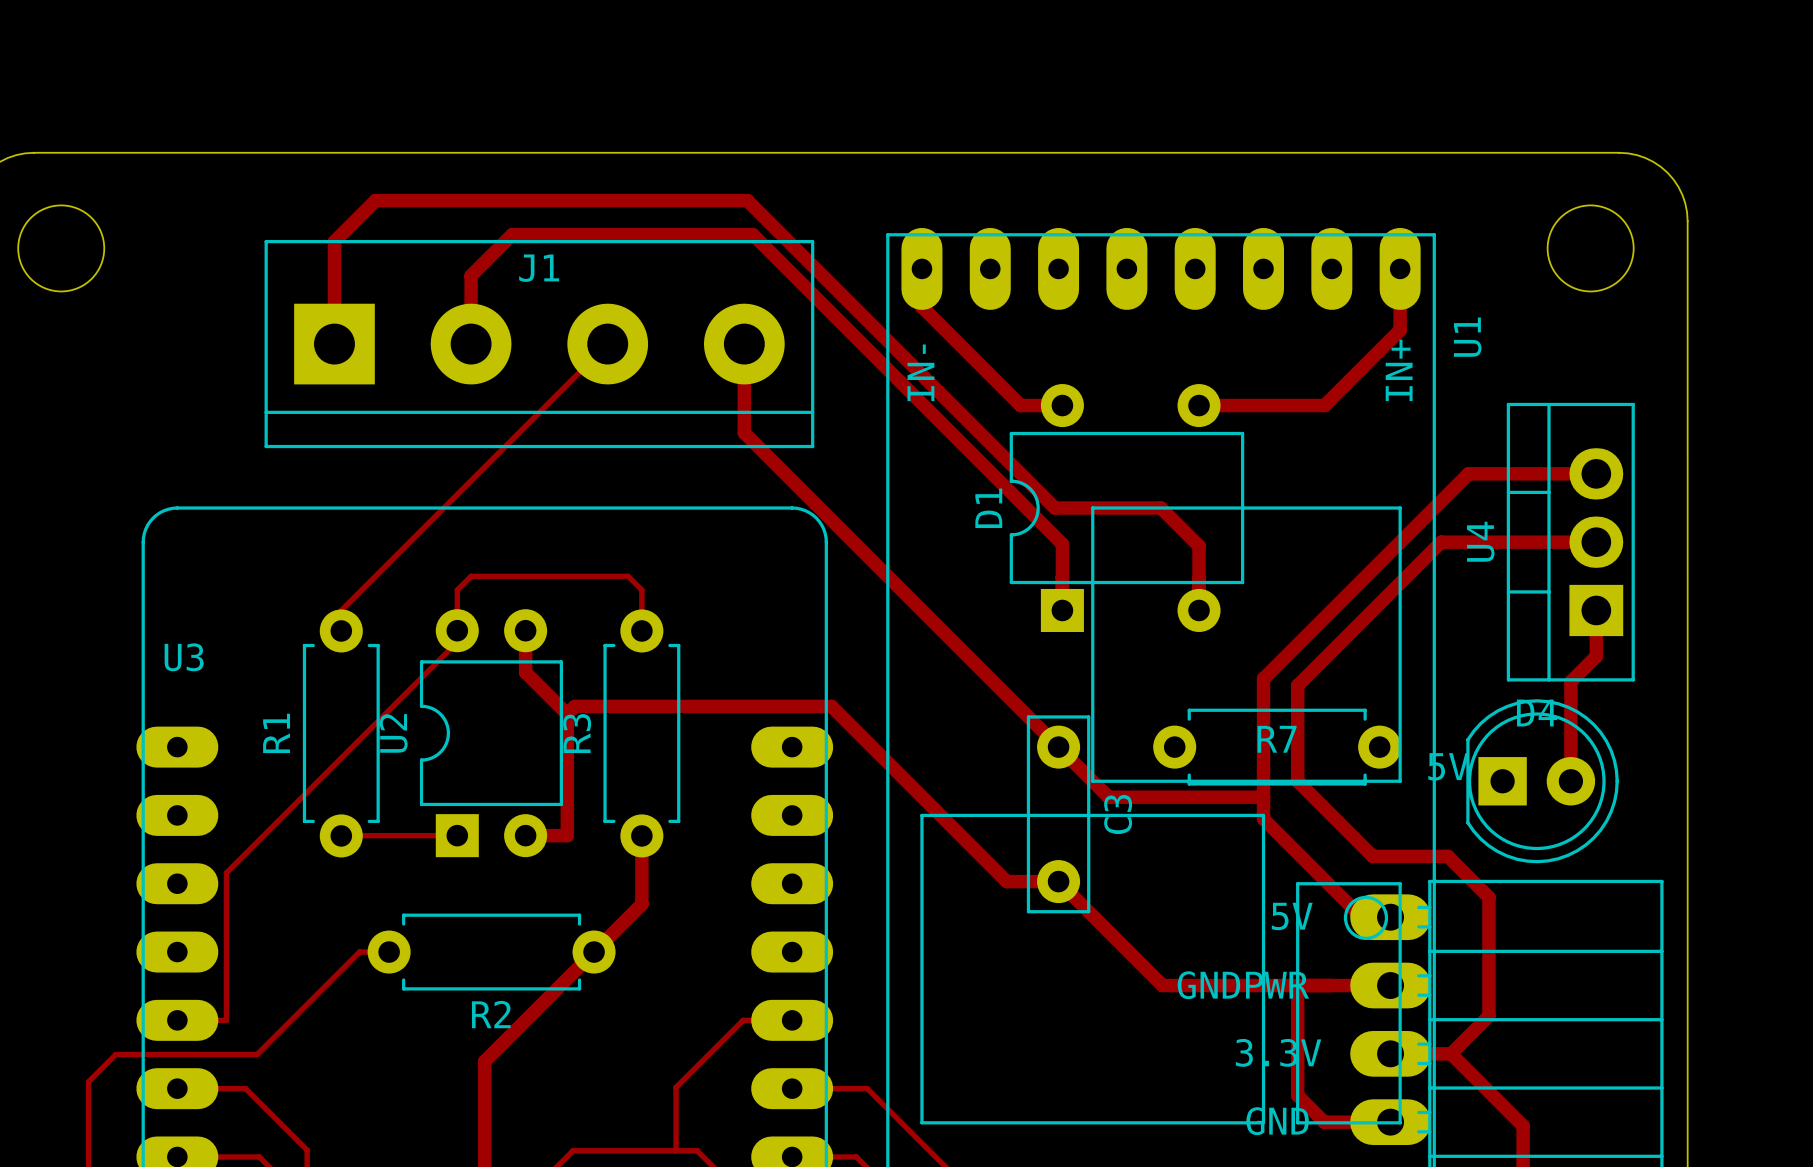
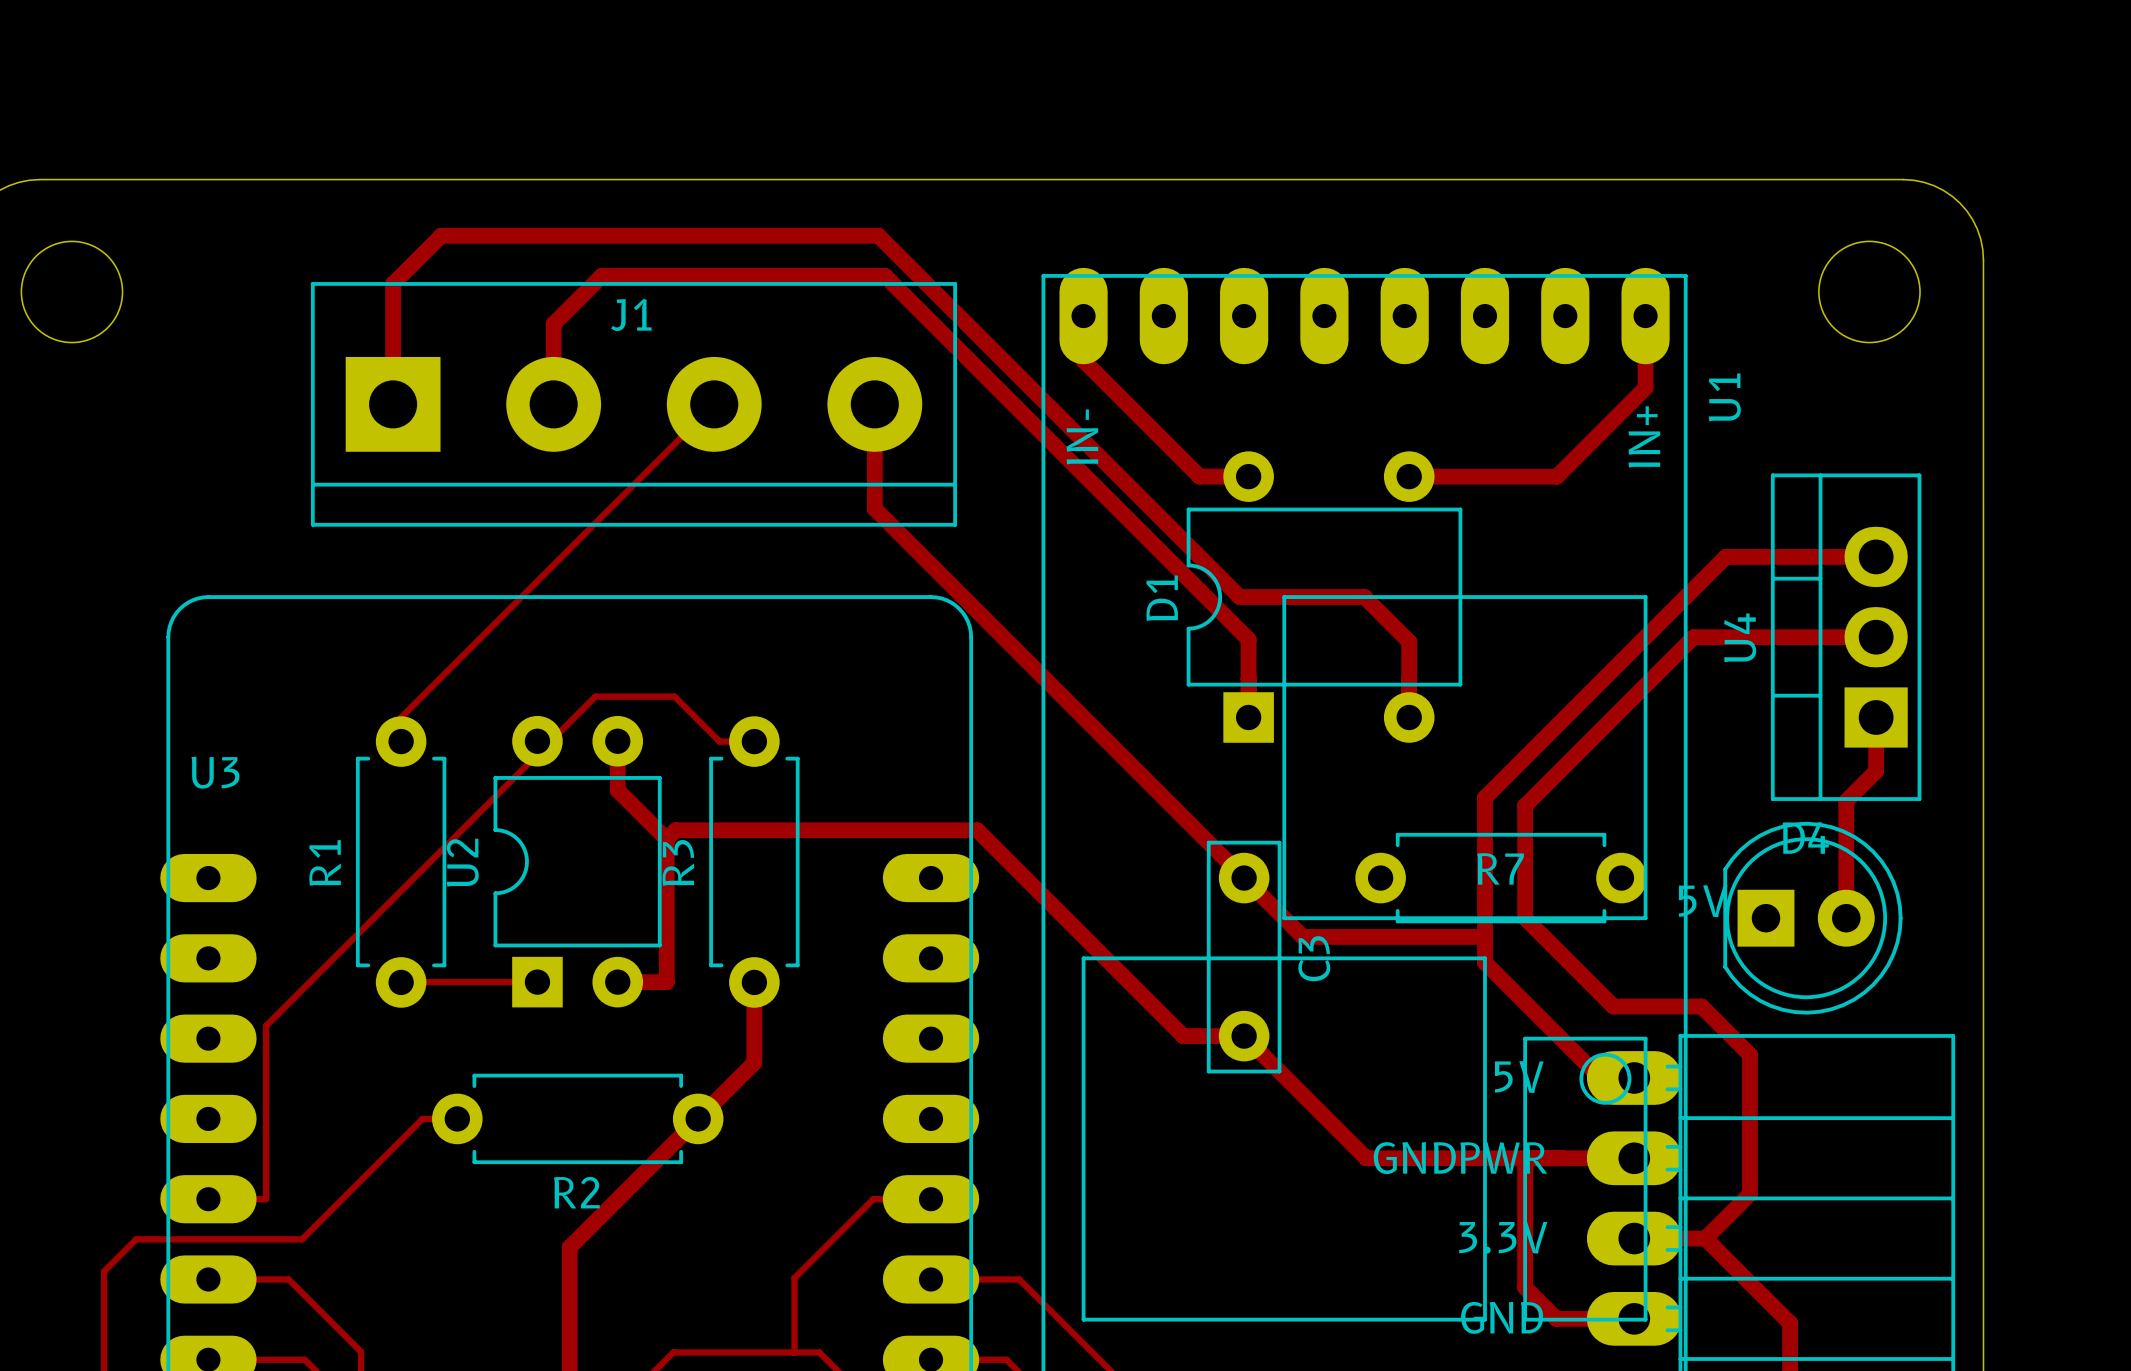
track: (457, 630) (457, 590) (471, 576) (628, 576) (641, 589) (641, 630) -> (550, 741) (595, 696) (674, 696) (719, 741) (754, 741)

